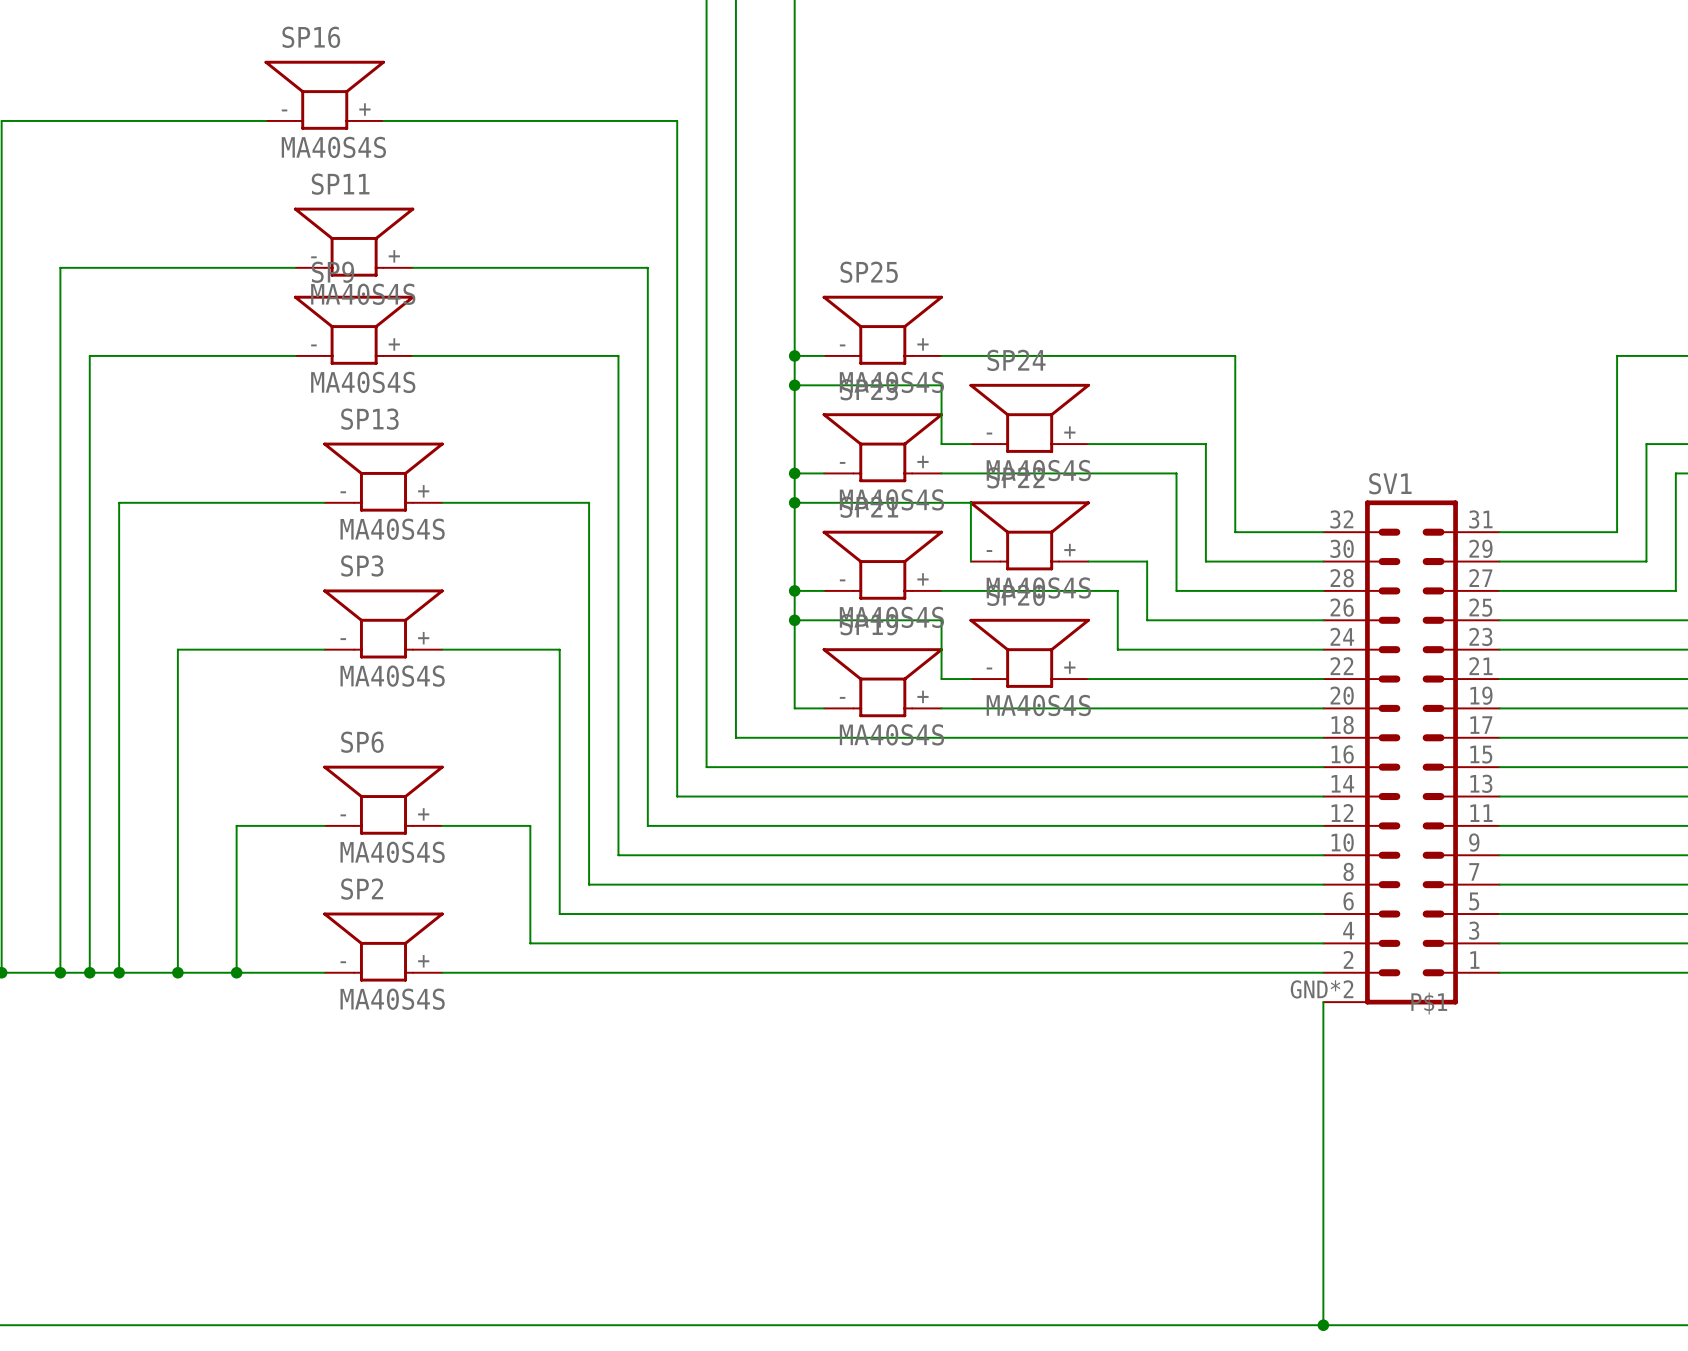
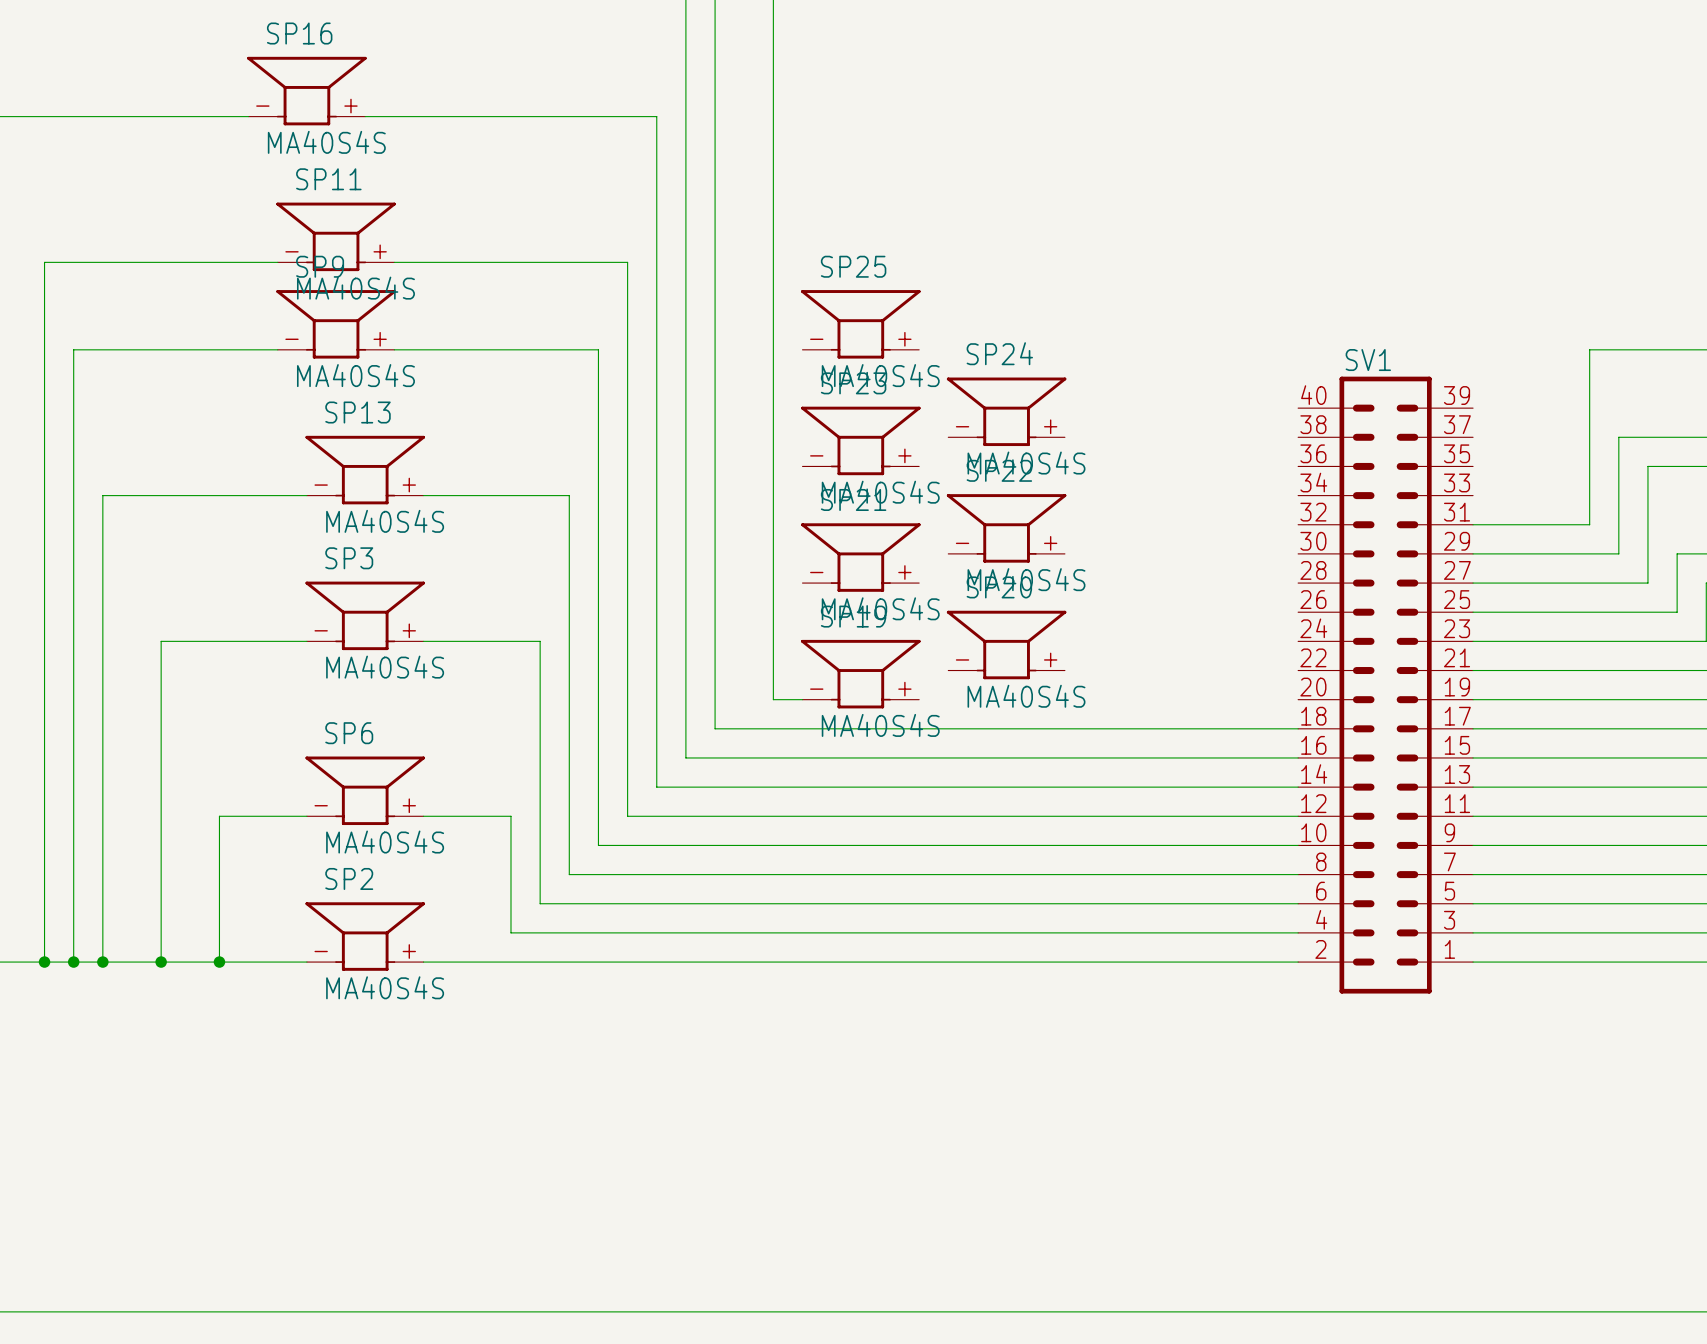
wire: (794, 355) (824, 355) -> none
junction: (794, 355) -> none
wire: (941, 355) (1235, 355) (1235, 532) (1323, 532) -> none
wire: (794, 385) (941, 385) (941, 444) (970, 444) -> none
junction: (794, 385) -> none
wire: (1088, 444) (1205, 444) (1205, 561) (1323, 561) -> none
wire: (794, 473) (824, 473) -> none
junction: (794, 473) -> none
wire: (941, 473) (1176, 473) (1176, 590) (1323, 590) -> none
SV1 name position: SV1 (1390, 483) -> SV1 (1368, 360)
SV1 symbol: [1323, 500, 1500, 1005] -> [1298, 376, 1474, 994]
wire: (794, 502) (970, 502) (970, 561) -> none
junction: (794, 502) -> none
wire: (1088, 561) (1147, 561) (1147, 620) (1323, 620) -> none
wire: (794, 590) (824, 590) -> none
junction: (794, 590) -> none
wire: (941, 590) (1117, 590) (1117, 649) (1323, 649) -> none
wire: (794, 620) (941, 620) (941, 679) (970, 679) -> none
junction: (794, 620) -> none
wire: (1088, 679) (1323, 679) -> none
wire: (941, 708) (1323, 708) -> none
wire: (1323, 1002) (1323, 1325) -> none
junction: (1323, 1325) -> none

